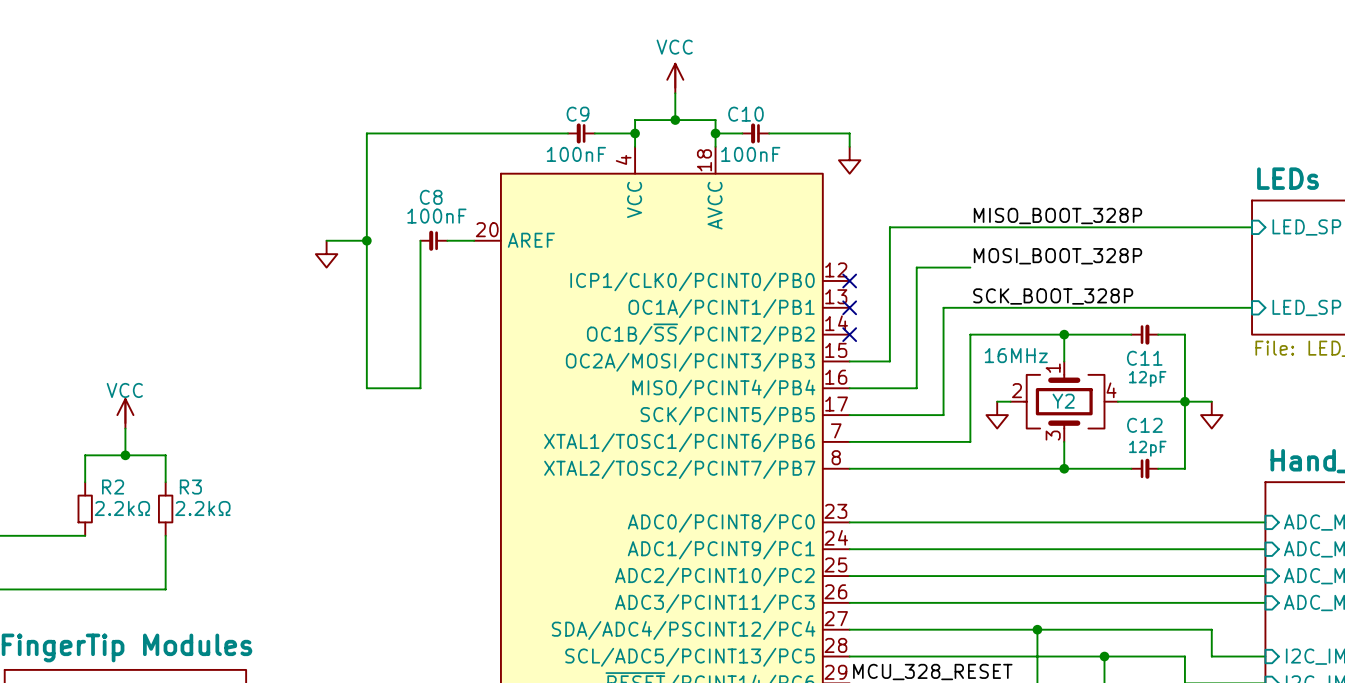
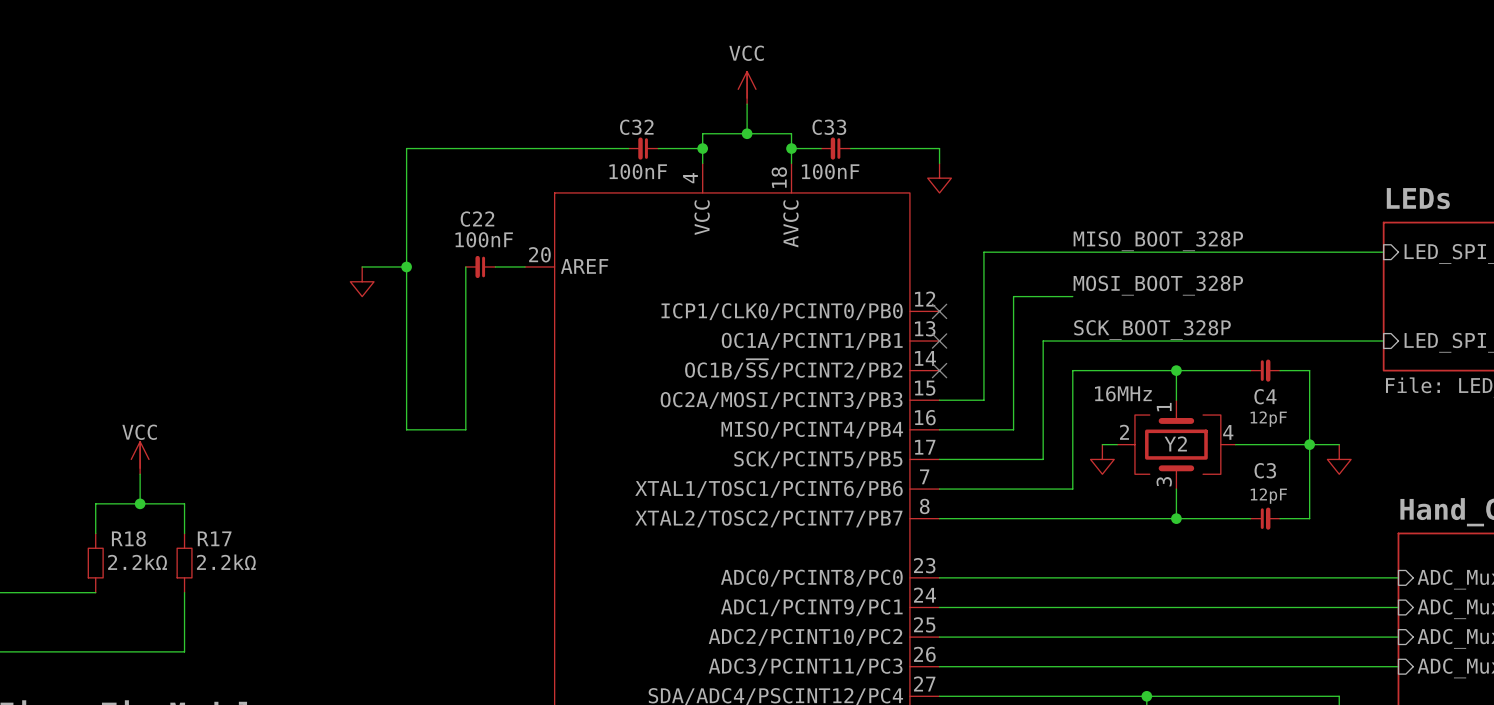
C9 name: C9 (578, 114) -> C32 (636, 127)
C10 name: C10 (745, 114) -> C33 (829, 127)
C8 name: C8 (431, 197) -> C22 (477, 219)
C11 name: C11 (1144, 358) -> C4 (1265, 396)
C12 name: C12 (1144, 425) -> C3 (1265, 470)
R2 name: R2 (113, 487) -> R18 (128, 538)
R3 name: R3 (190, 487) -> R17 (214, 538)

